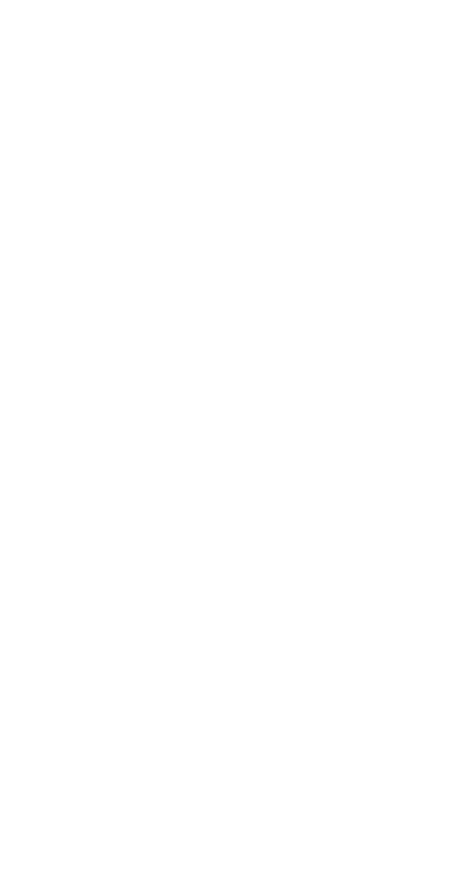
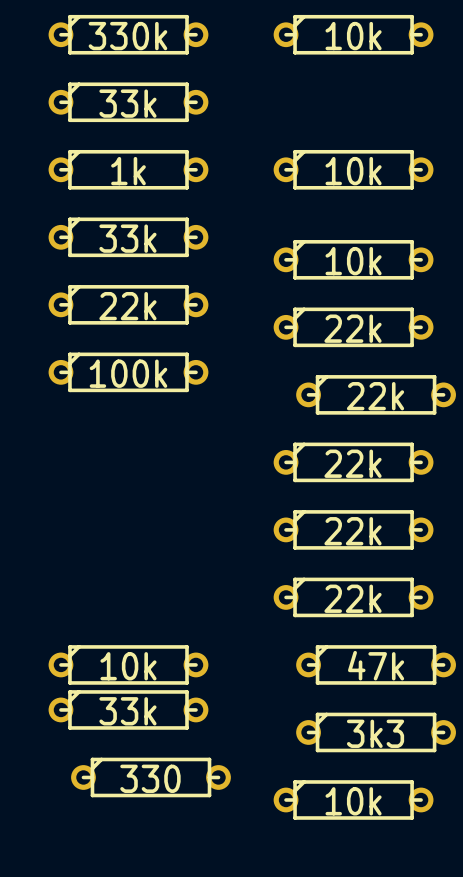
part: none -> 330k (128, 34)
part: none -> 10k (353, 34)
part: none -> 33k (128, 102)
part: none -> 1k (128, 169)
part: none -> 10k (353, 169)
part: none -> 33k (128, 237)
part: none -> 10k (353, 259)
part: none -> 22k (128, 304)
part: none -> 22k (353, 327)
part: none -> 100k (128, 372)
part: none -> 22k (376, 394)
part: none -> 22k (353, 462)
part: none -> 22k (353, 529)
part: none -> 22k (353, 597)
part: none -> 10k (128, 664)
part: none -> 47k (376, 664)
part: none -> 33k (128, 709)
part: none -> 3k3 (376, 732)
part: none -> 330 (150, 777)
part: none -> 10k (353, 799)

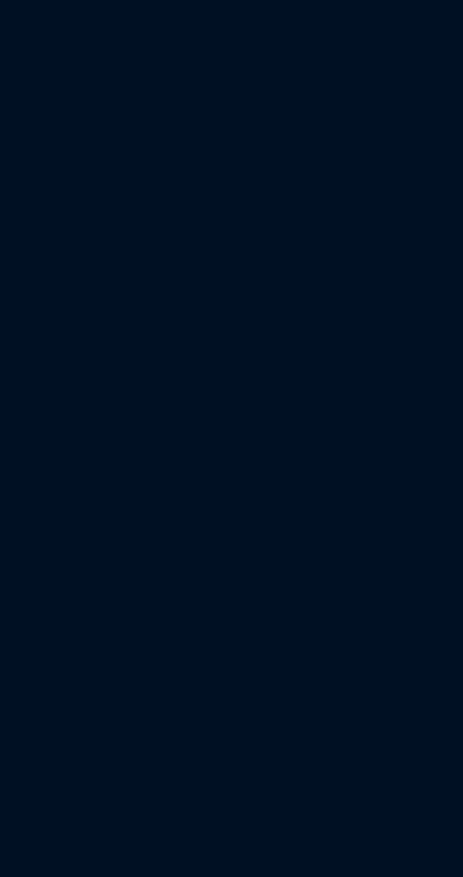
part: 330k (128, 34) -> none
part: 10k (353, 34) -> none
part: 33k (128, 102) -> none
part: 1k (128, 169) -> none
part: 10k (353, 169) -> none
part: 33k (128, 237) -> none
part: 10k (353, 259) -> none
part: 22k (128, 304) -> none
part: 22k (353, 327) -> none
part: 100k (128, 372) -> none
part: 22k (376, 394) -> none
part: 22k (353, 462) -> none
part: 22k (353, 529) -> none
part: 22k (353, 597) -> none
part: 10k (128, 664) -> none
part: 47k (376, 664) -> none
part: 33k (128, 709) -> none
part: 3k3 (376, 732) -> none
part: 330 (150, 777) -> none
part: 10k (353, 799) -> none

